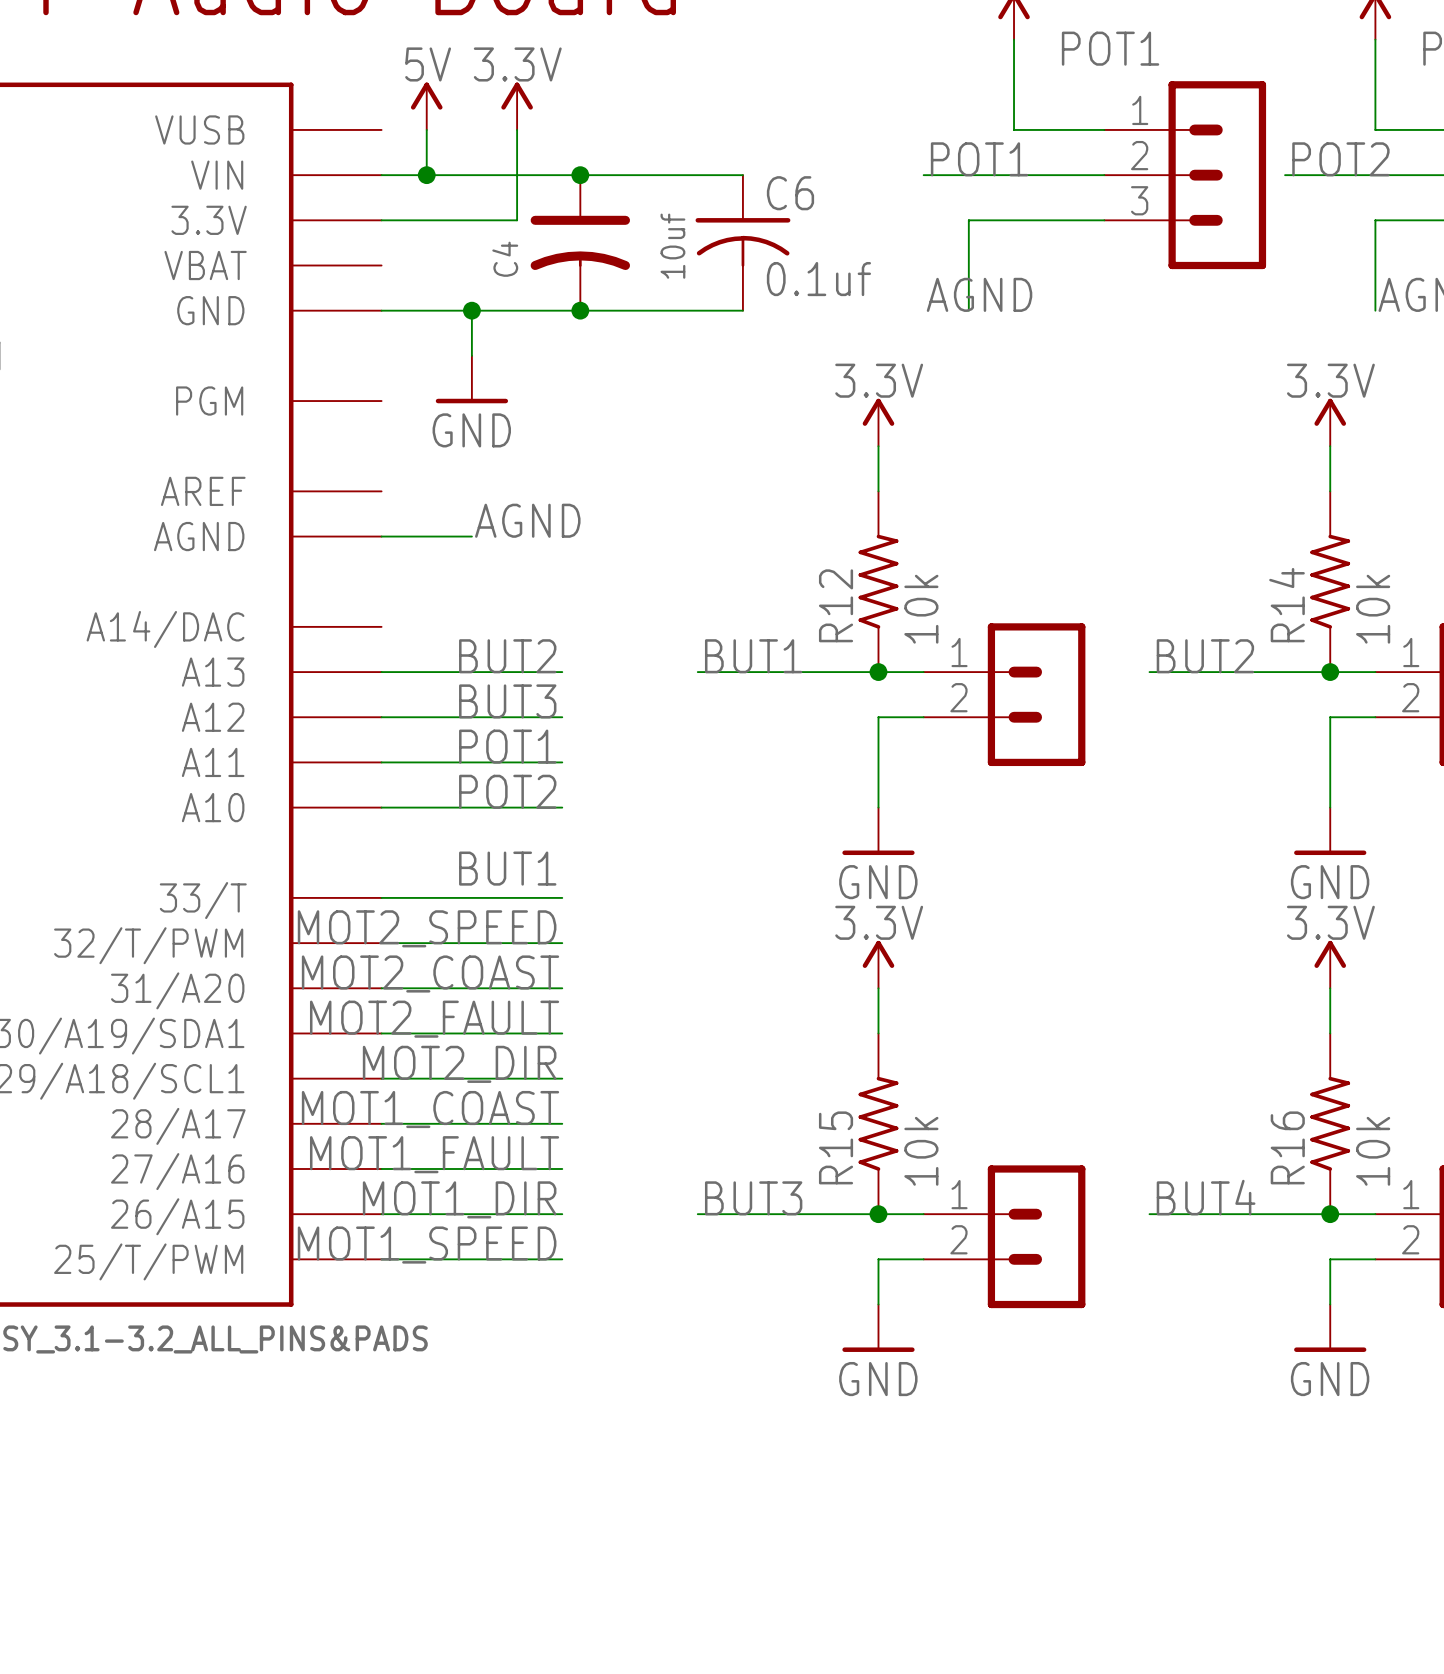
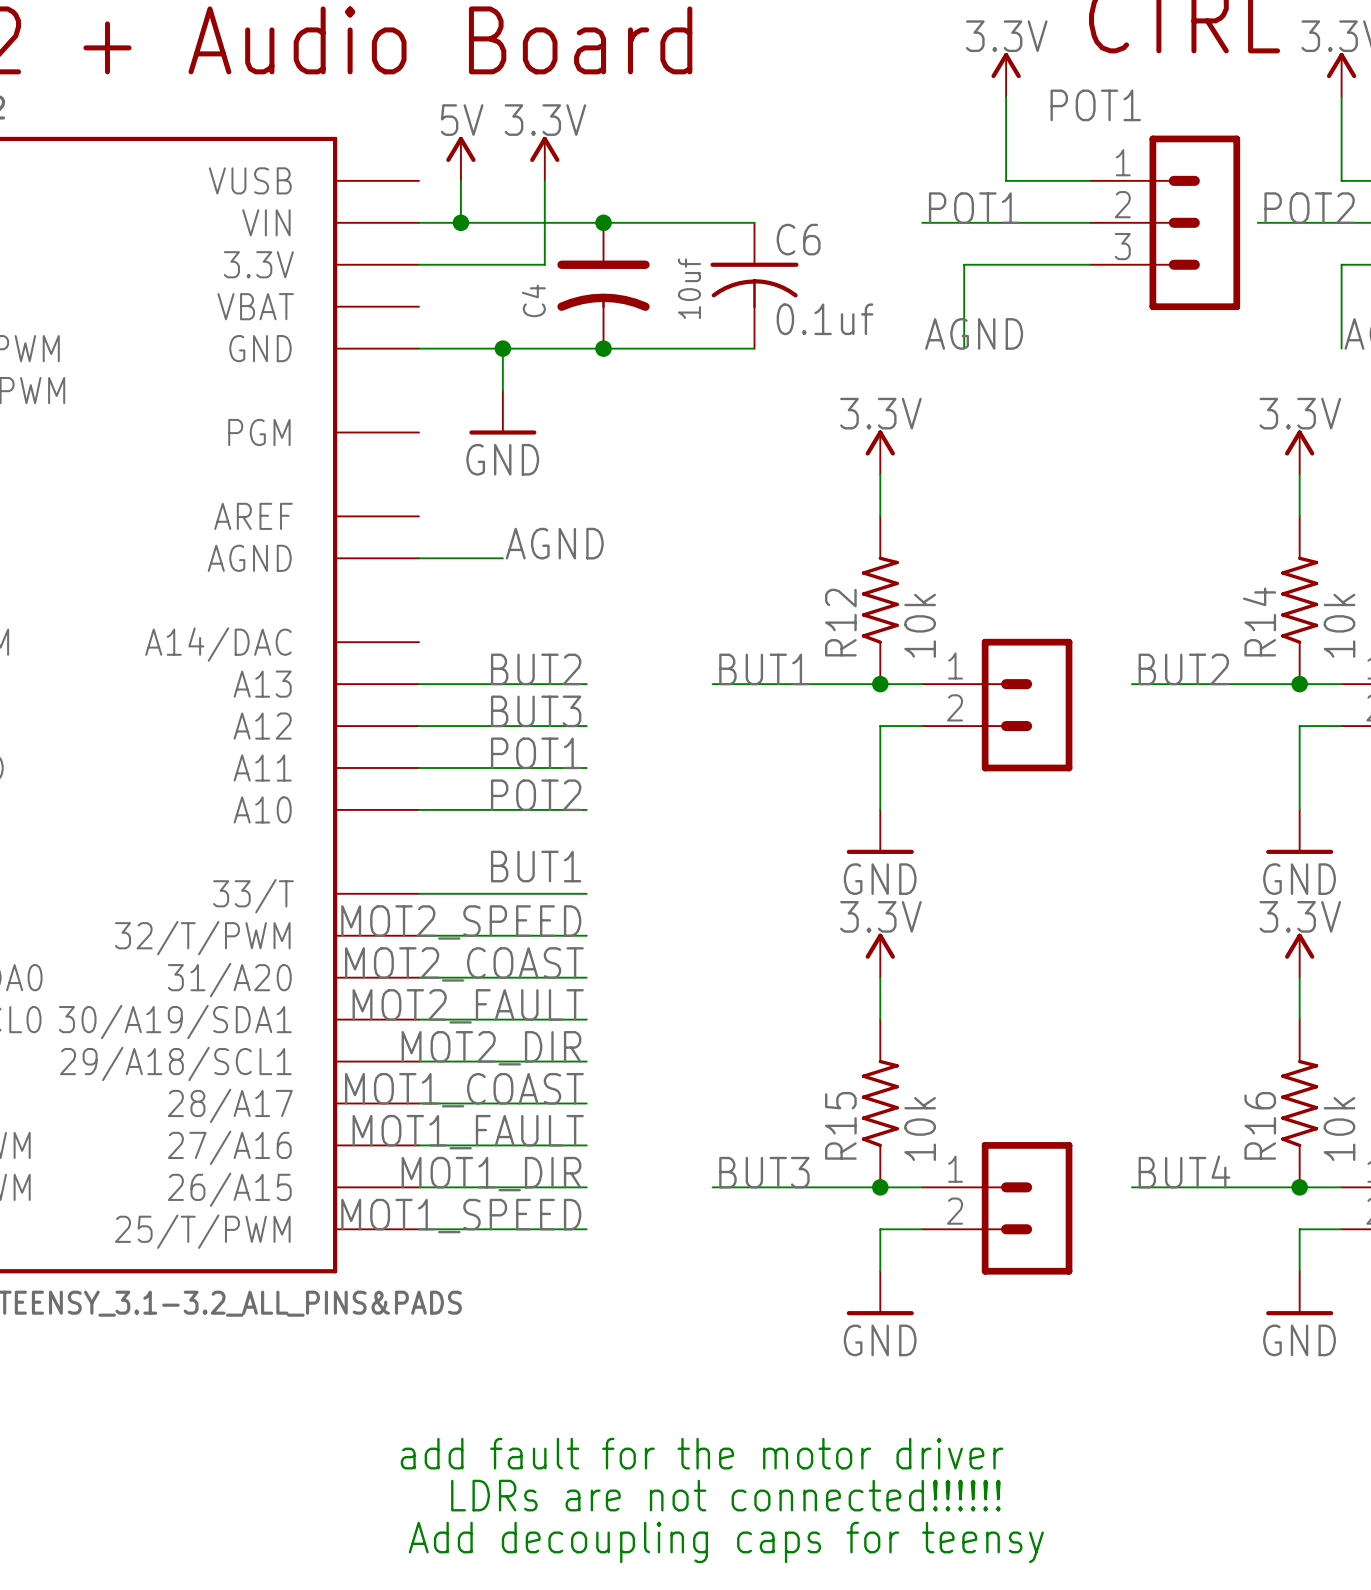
text: none -> add fault for the motor driver (701, 1453)
text: none -> LDRs are not connected!!!!!! (725, 1495)
text: none -> Add decoupling caps for teensy (726, 1542)

